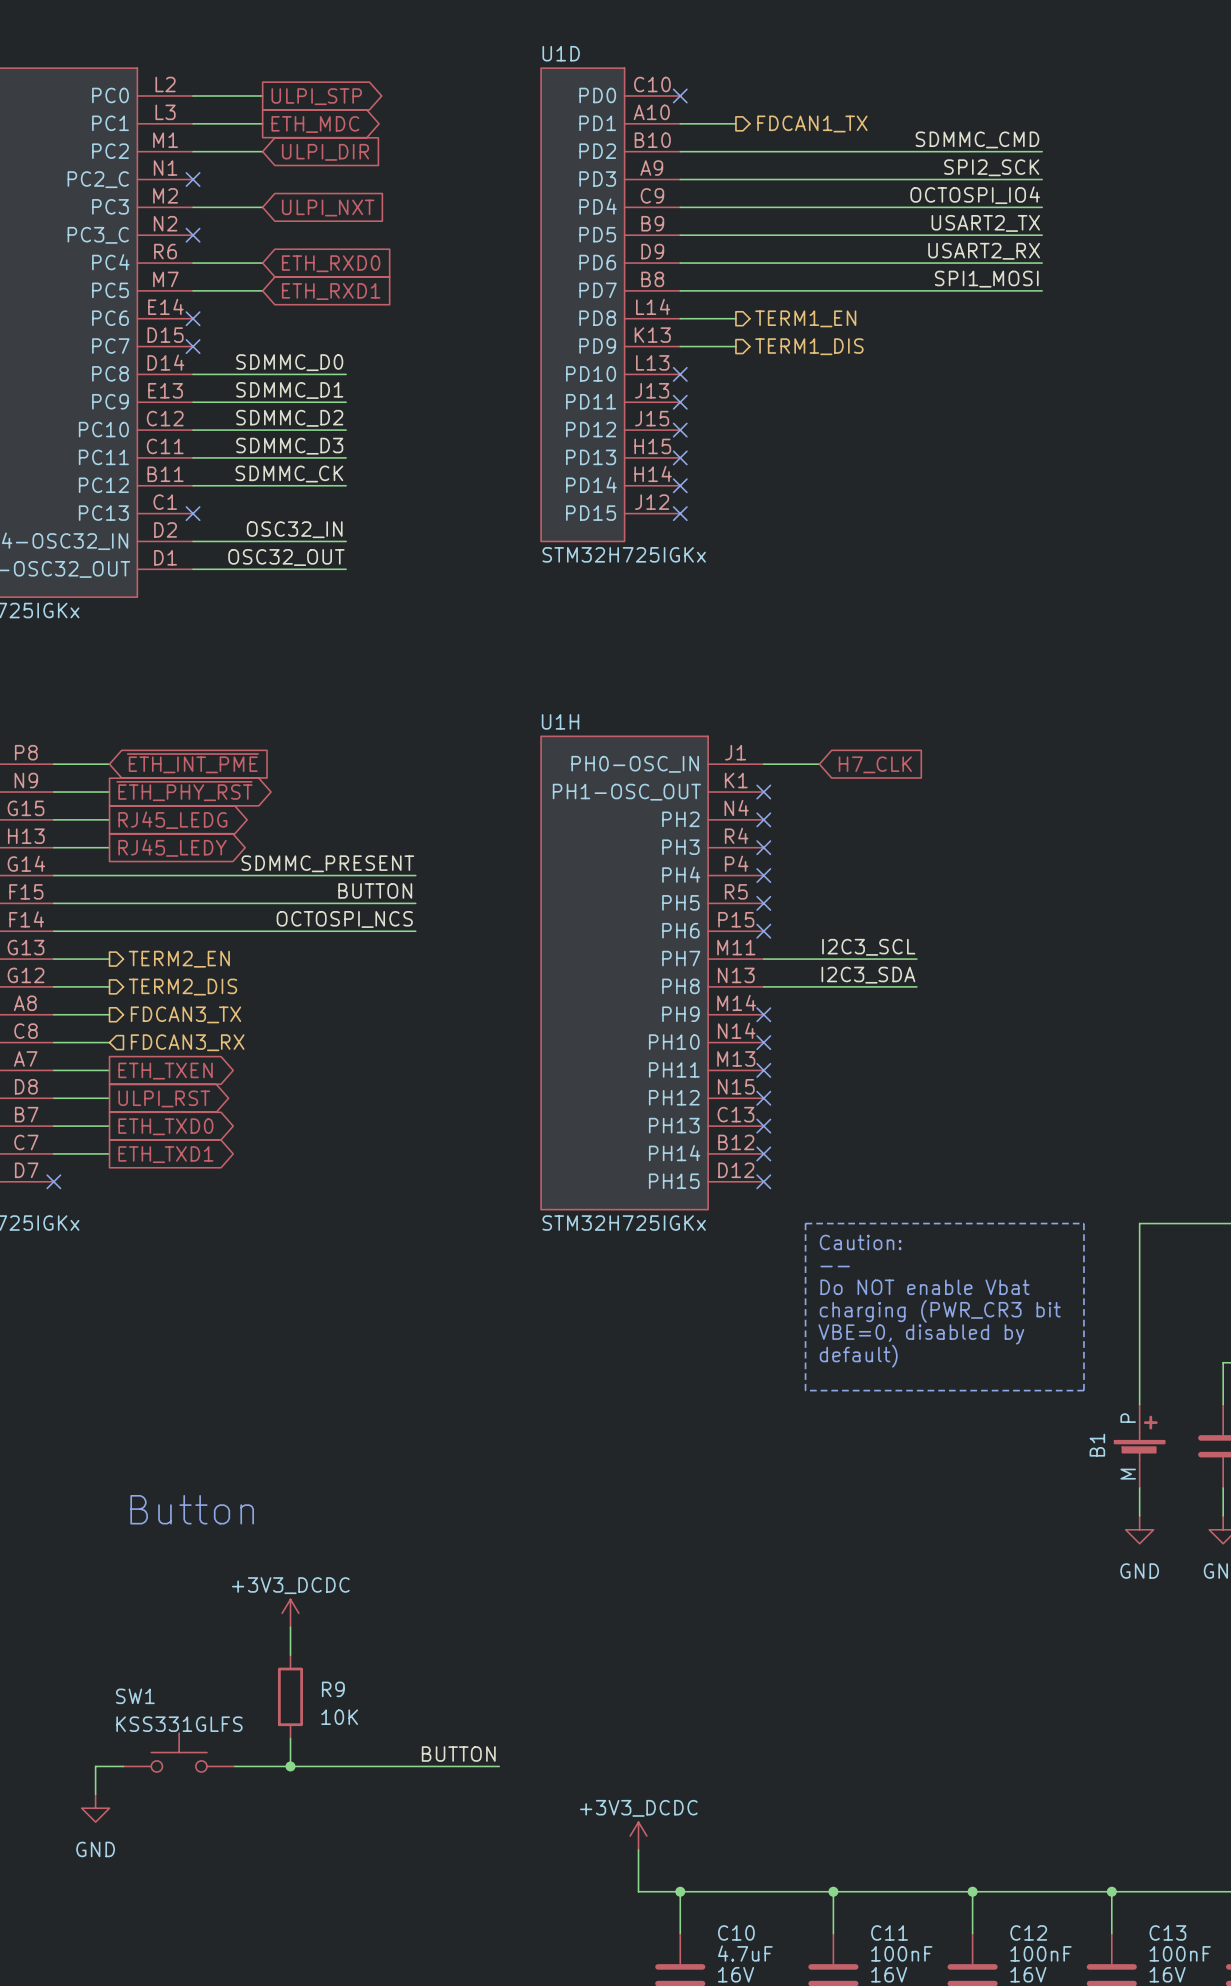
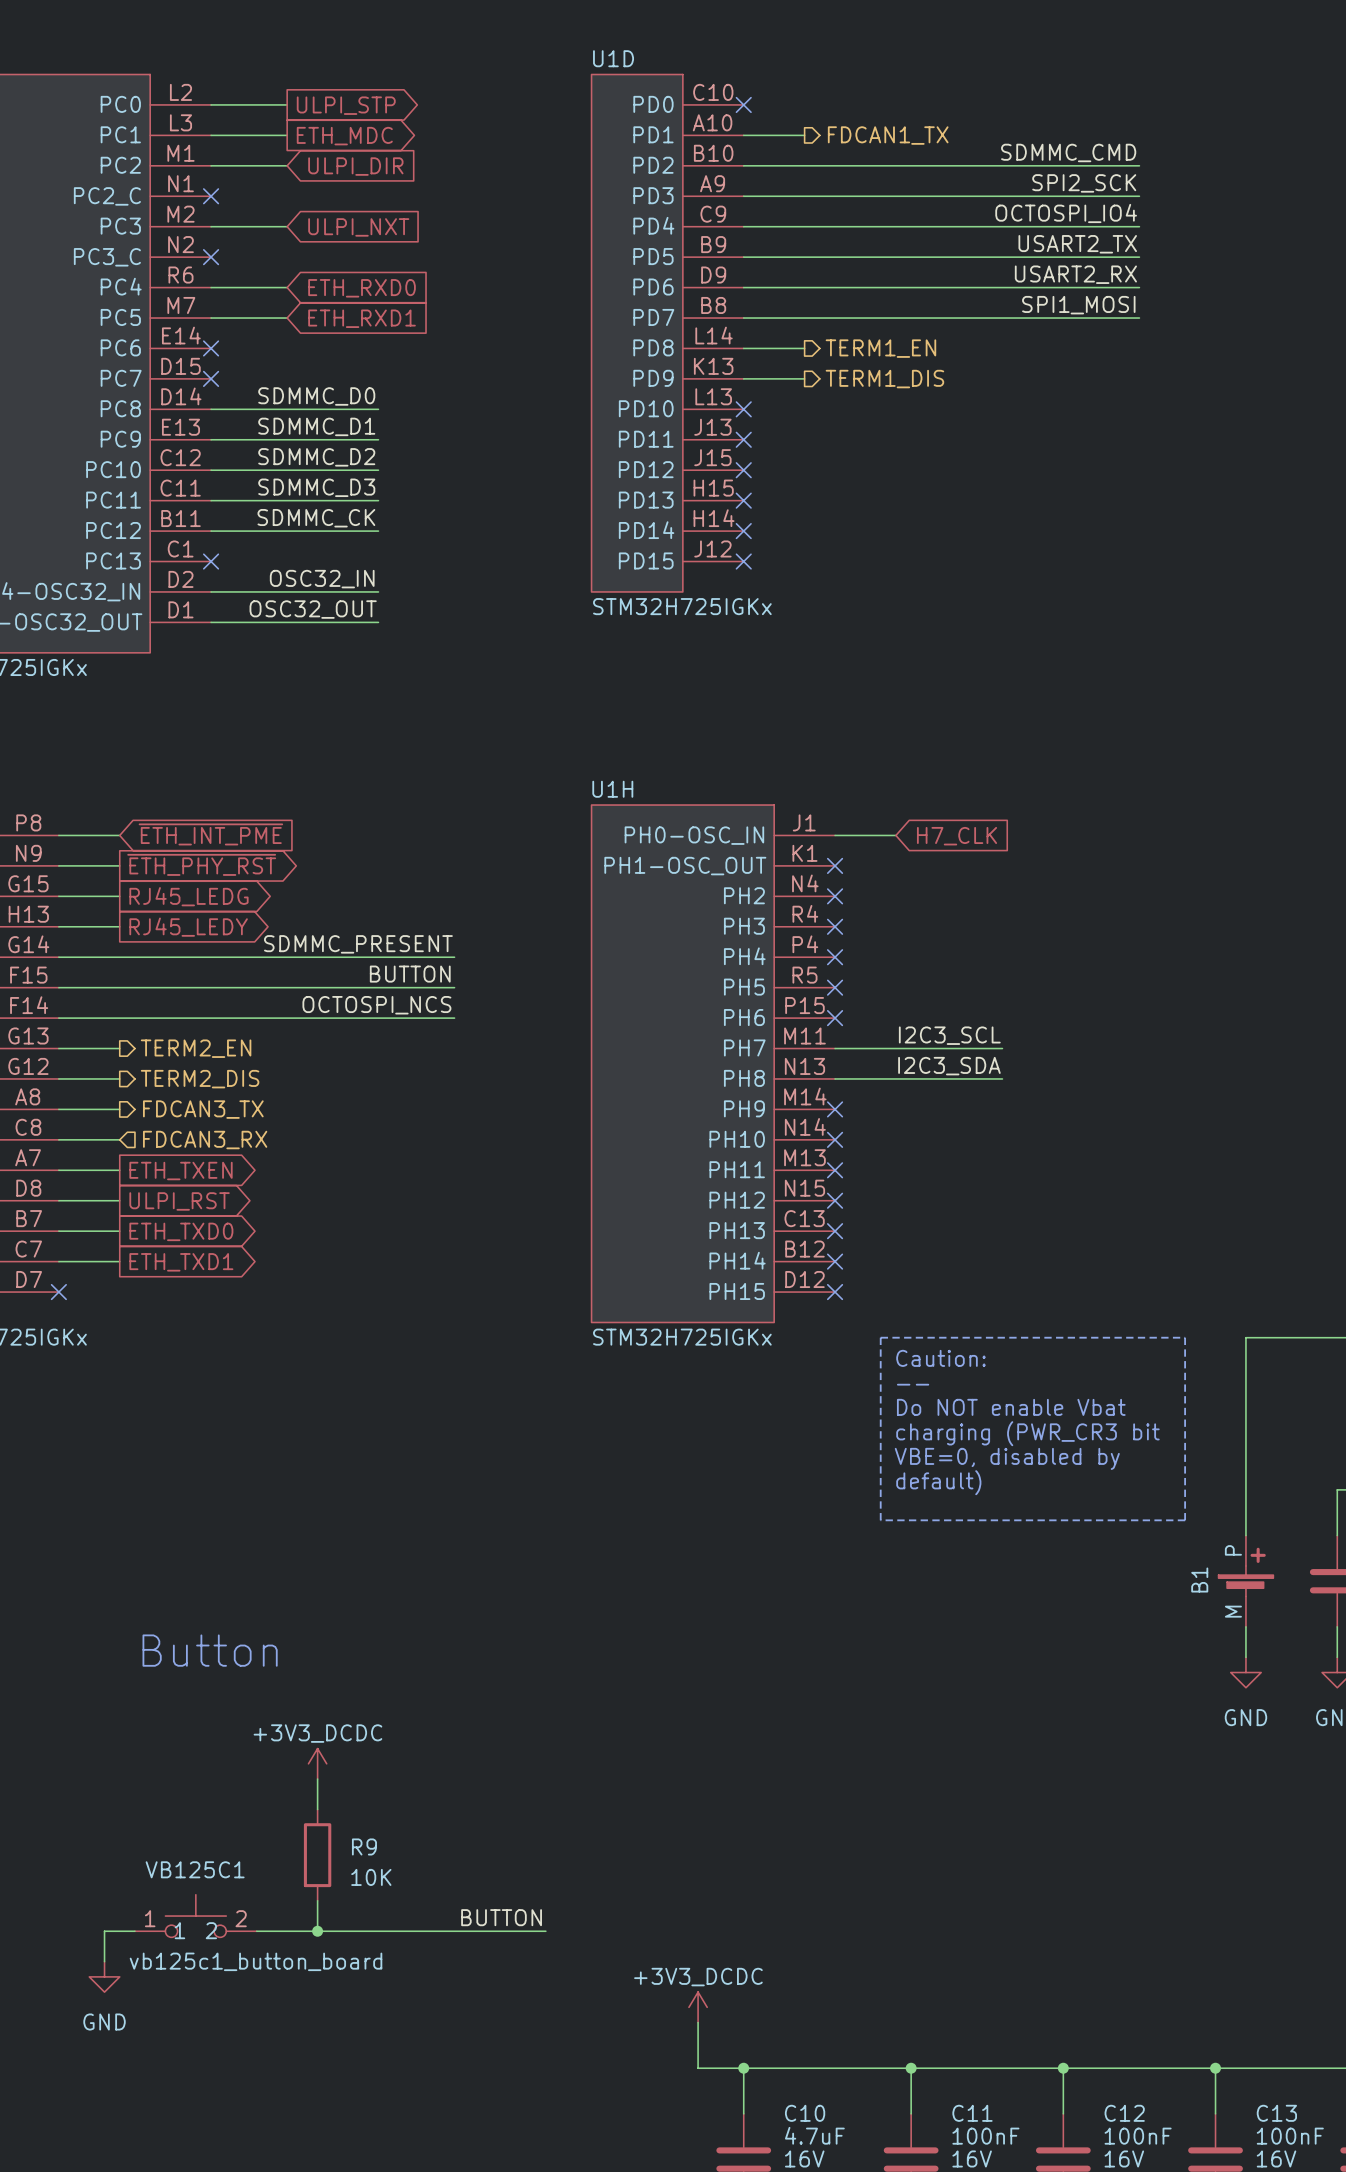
SW1 name: SW1 (135, 1696) -> VB125C1 (195, 1869)
SW1 value: KSS331GLFS (179, 1724) -> vb125c1_button_board (255, 1961)
SW1 pin number: none -> 1 (150, 1918)
SW1 pin number: none -> 2 (241, 1918)
SW1 pin name: none -> 1 (179, 1930)
SW1 pin name: none -> 2 (211, 1930)

